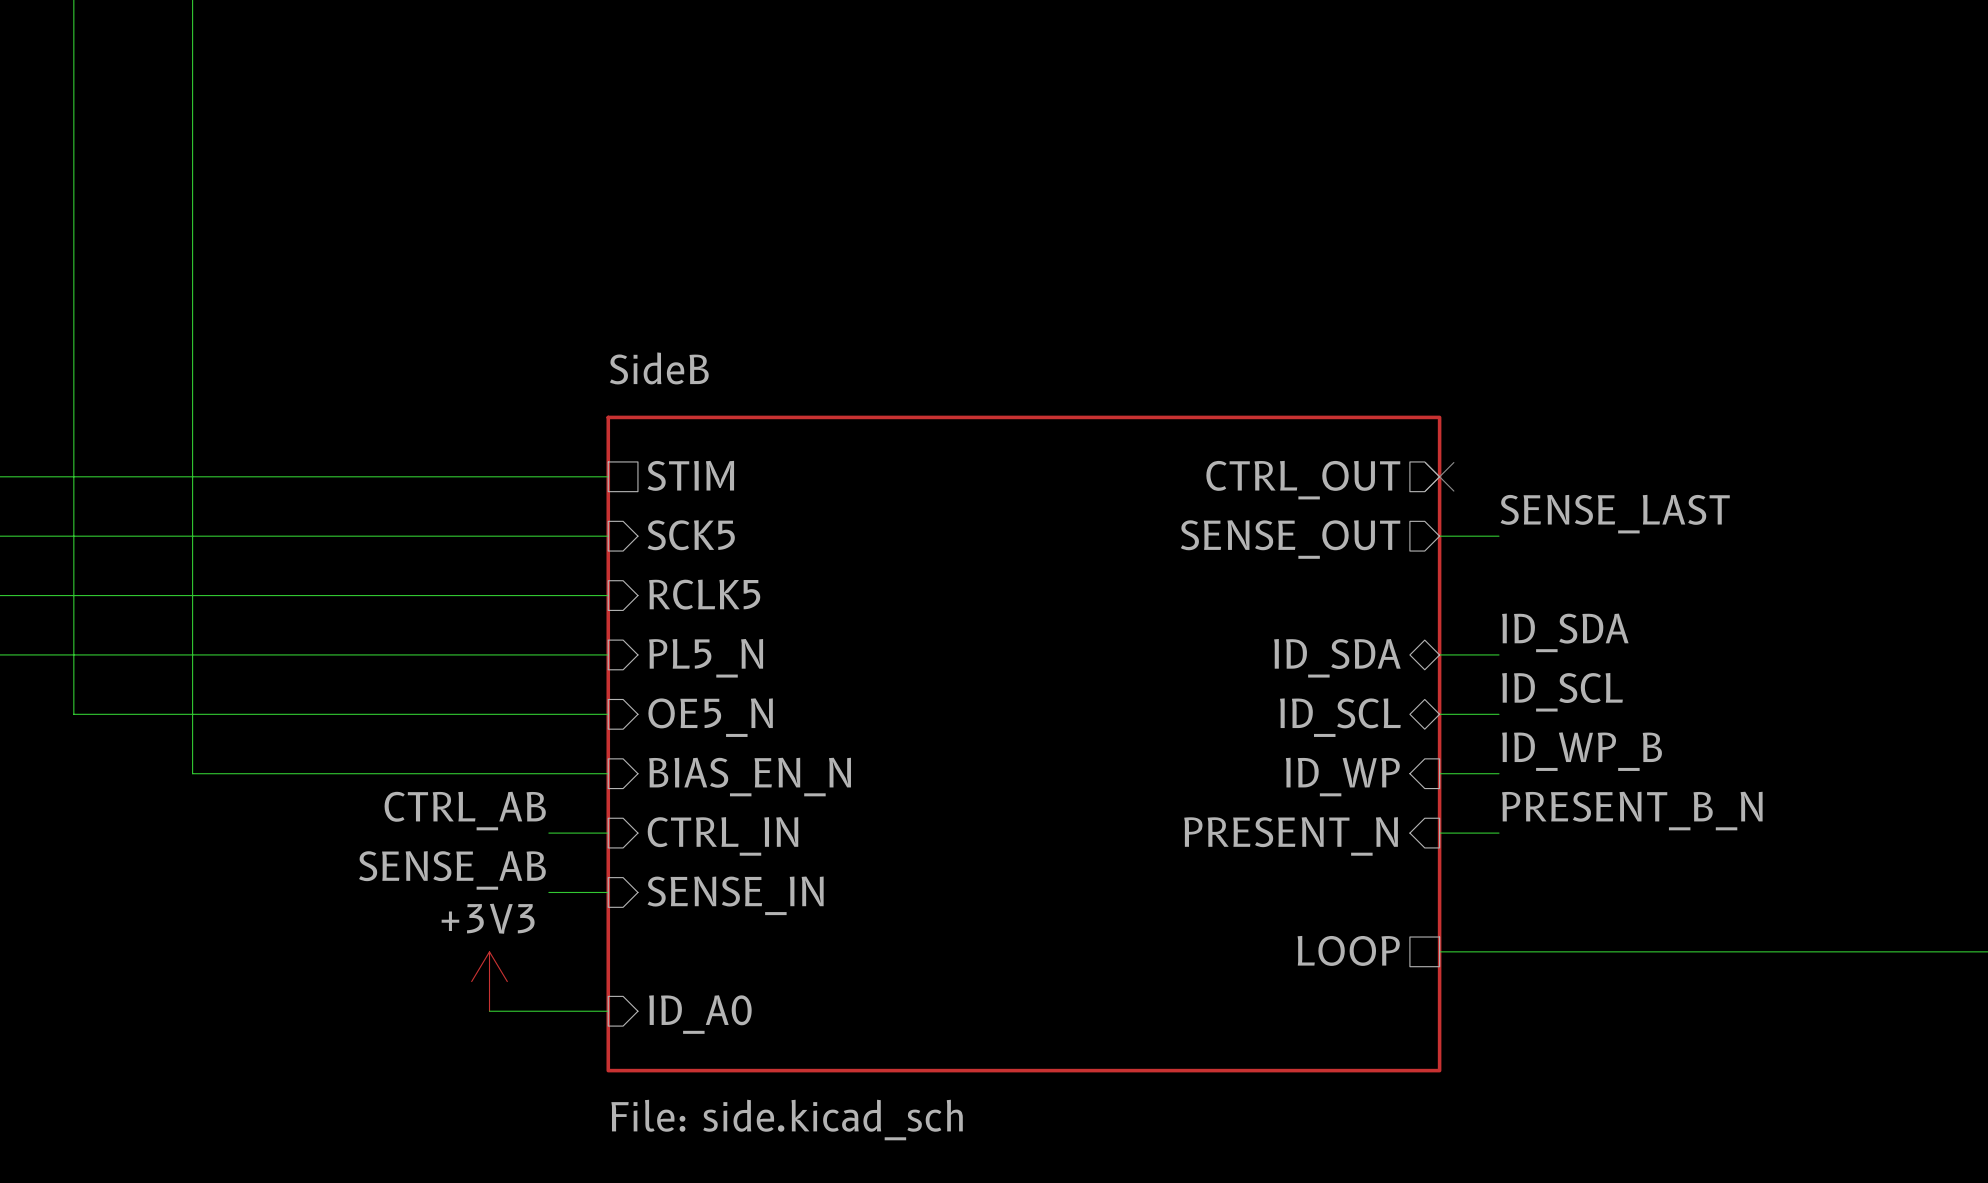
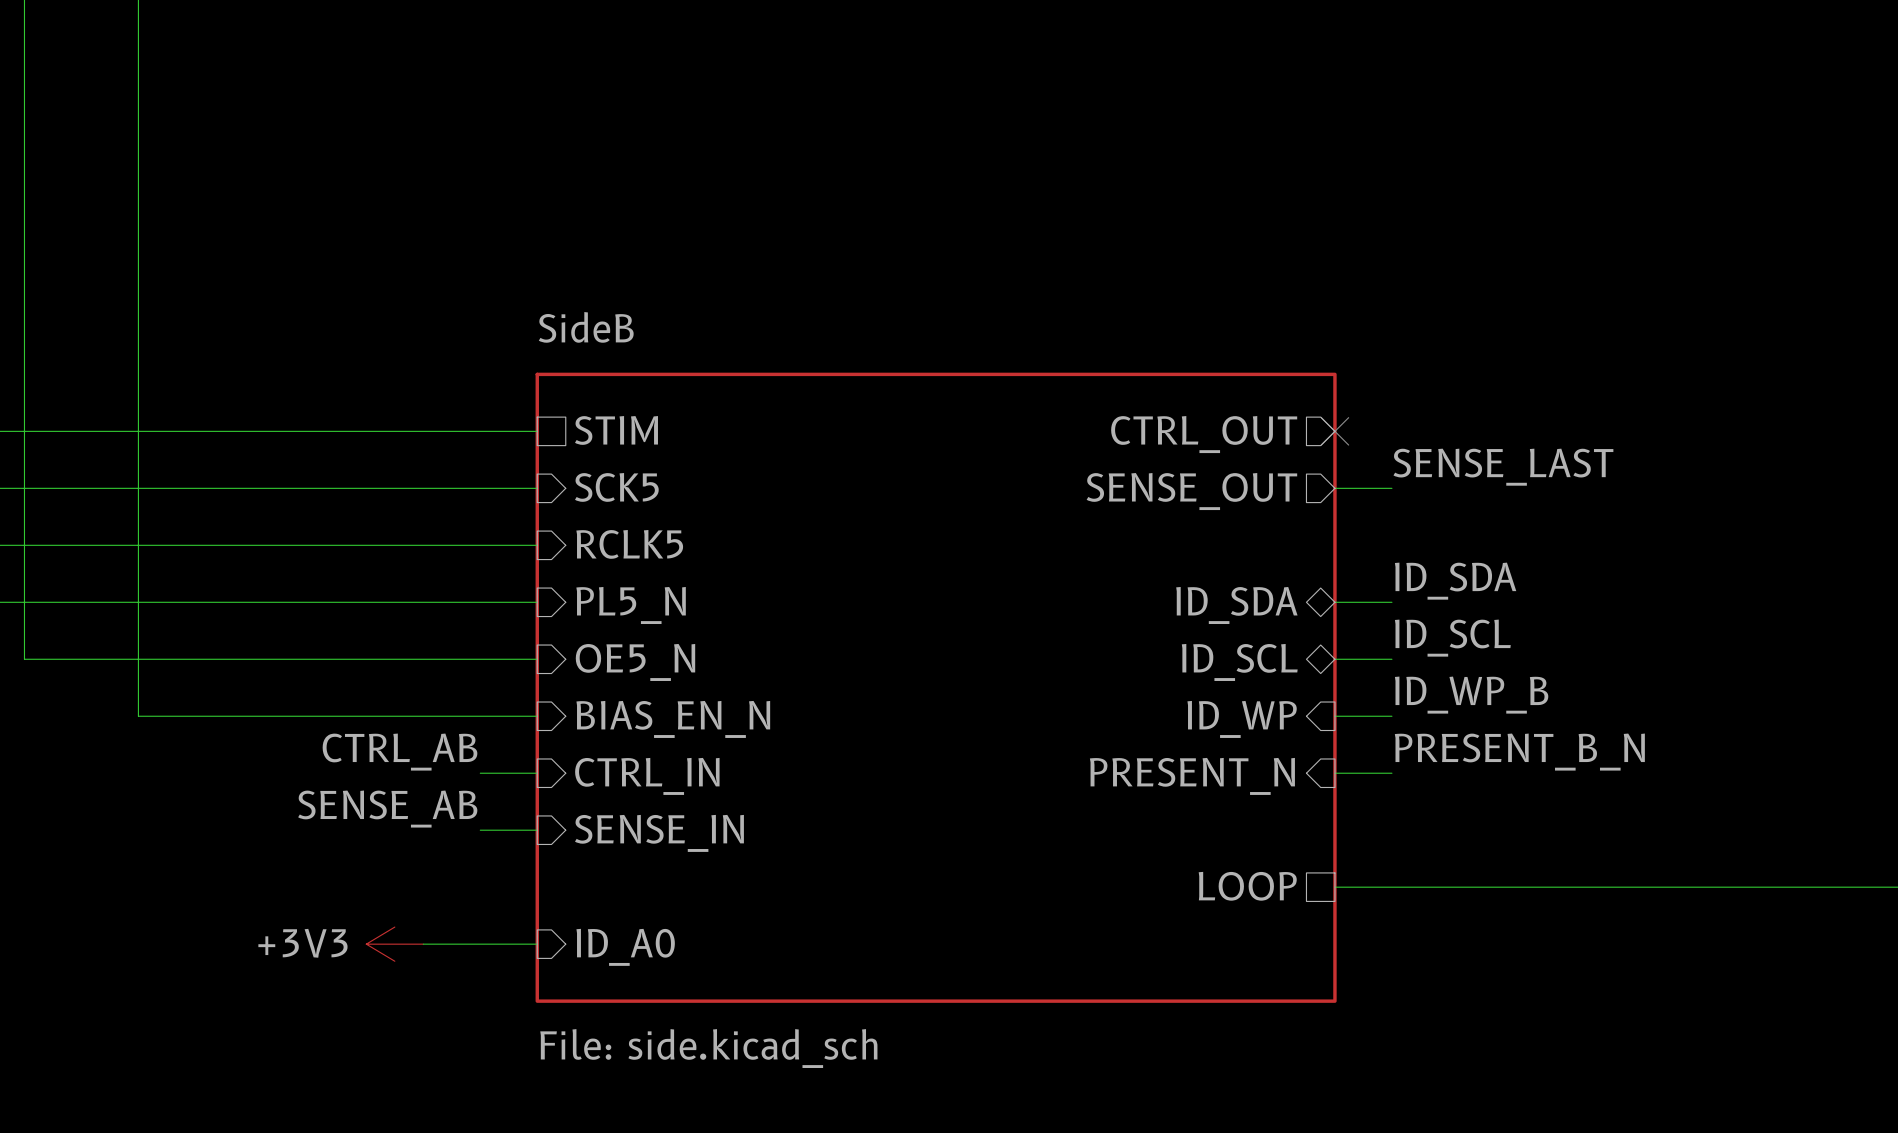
power symbol text position: +3V3 (488, 918) -> +3V3 (302, 943)
power symbol rotation: 0° (489, 981) -> 90° counterclockwise (394, 944)
power symbol position: +3V3 (489, 981) -> +3V3 (394, 944)

